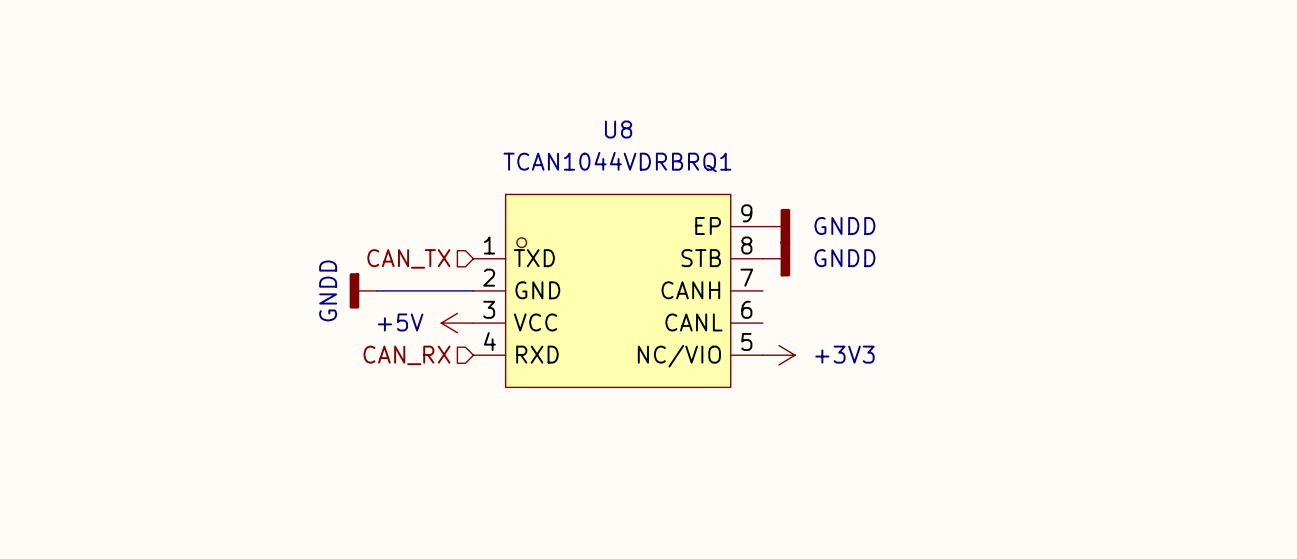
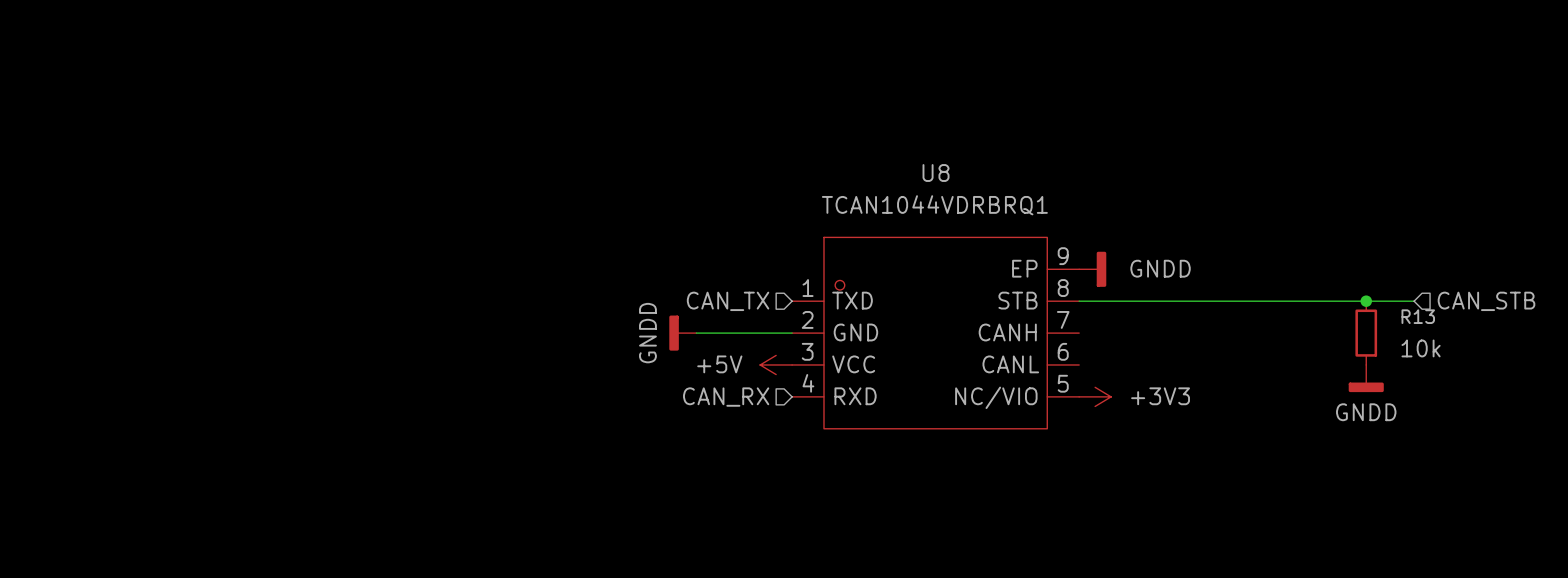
wire: none -> (1079, 301) (1414, 301)
power symbol rotation: 0° (776, 258) -> 90° clockwise (1366, 378)
power symbol position: GNDD (776, 258) -> GNDD (1366, 378)
power symbol text position: GNDD (844, 258) -> GNDD (1366, 412)
junction: none -> (1366, 301)
hierarchical label: none -> CAN_STB (1486, 301)
R13: none -> 10k (1366, 333)

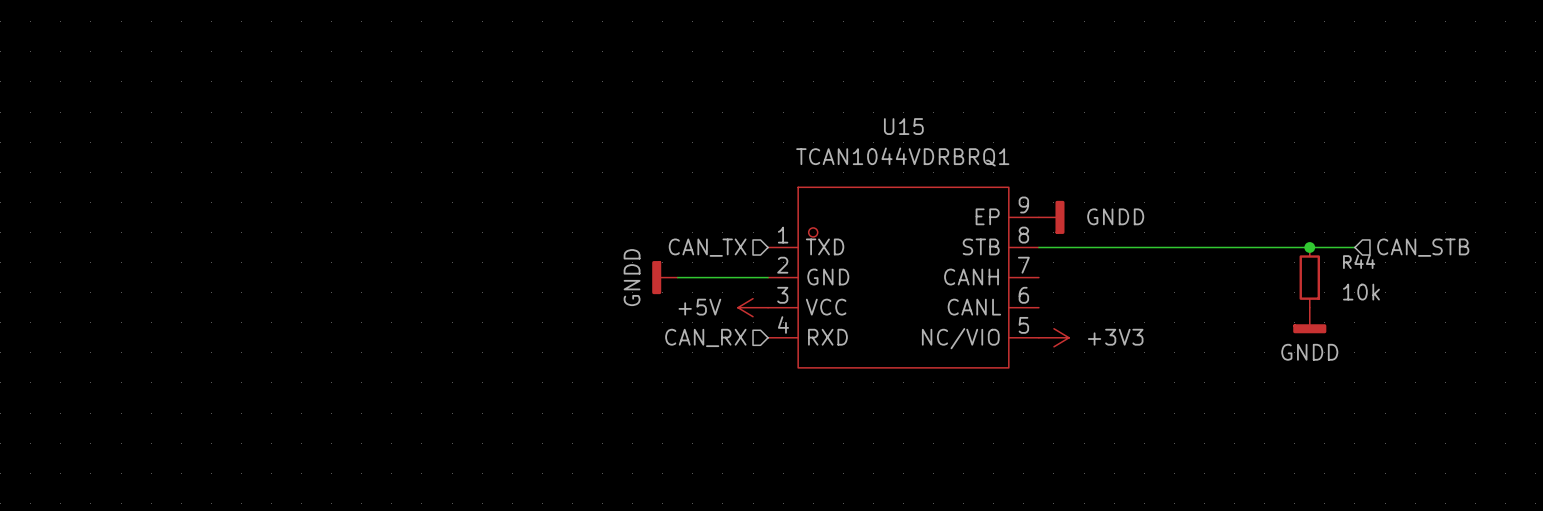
U8 name: U8 (936, 173) -> U15 (903, 126)
R13 name: R13 (1418, 316) -> R44 (1359, 261)

